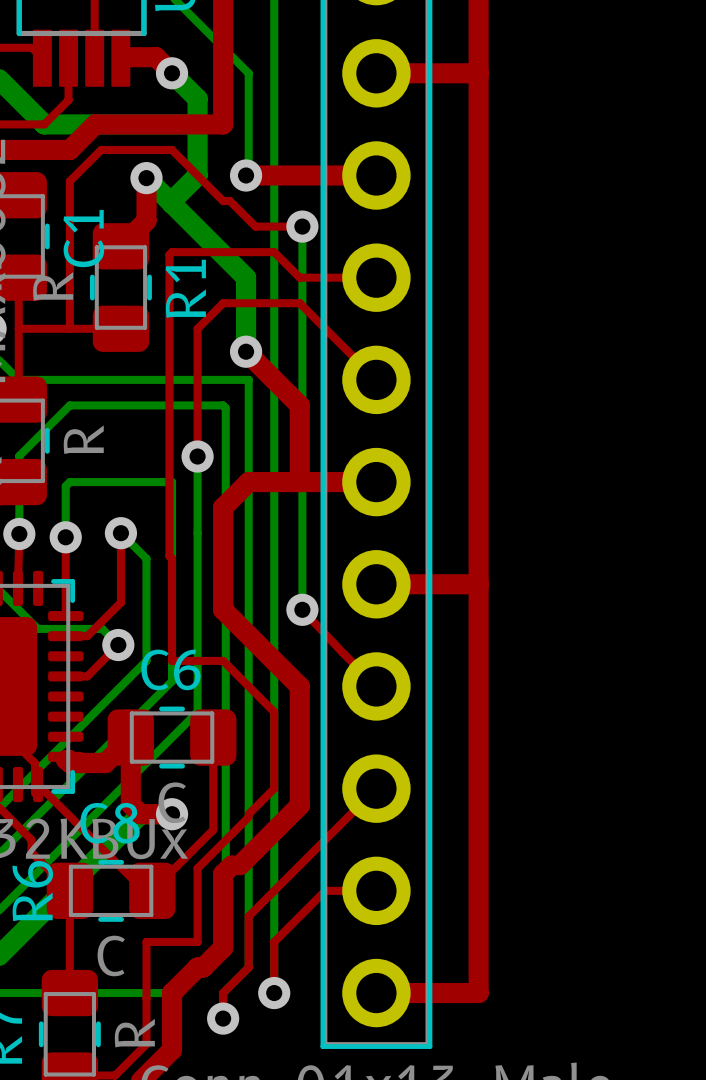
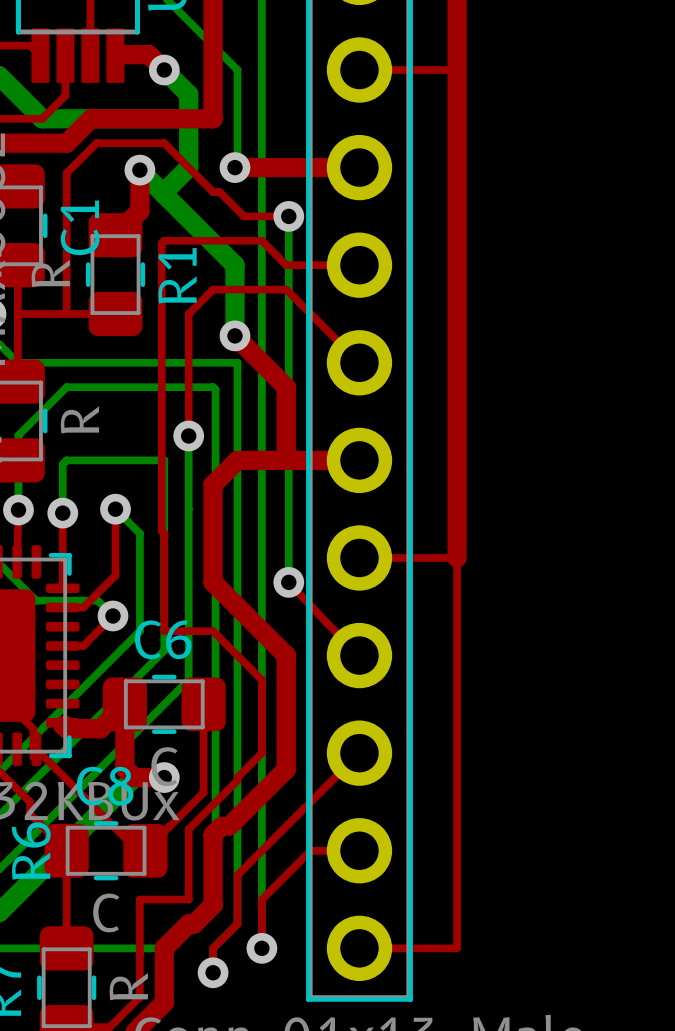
top track width: thick (376, 73) (478, 73) -> thin (359, 70) (457, 70)
top track width: thick (376, 584) (478, 584) (478, 993) (376, 993) -> thin (359, 557) (457, 557) (457, 948) (359, 948)

